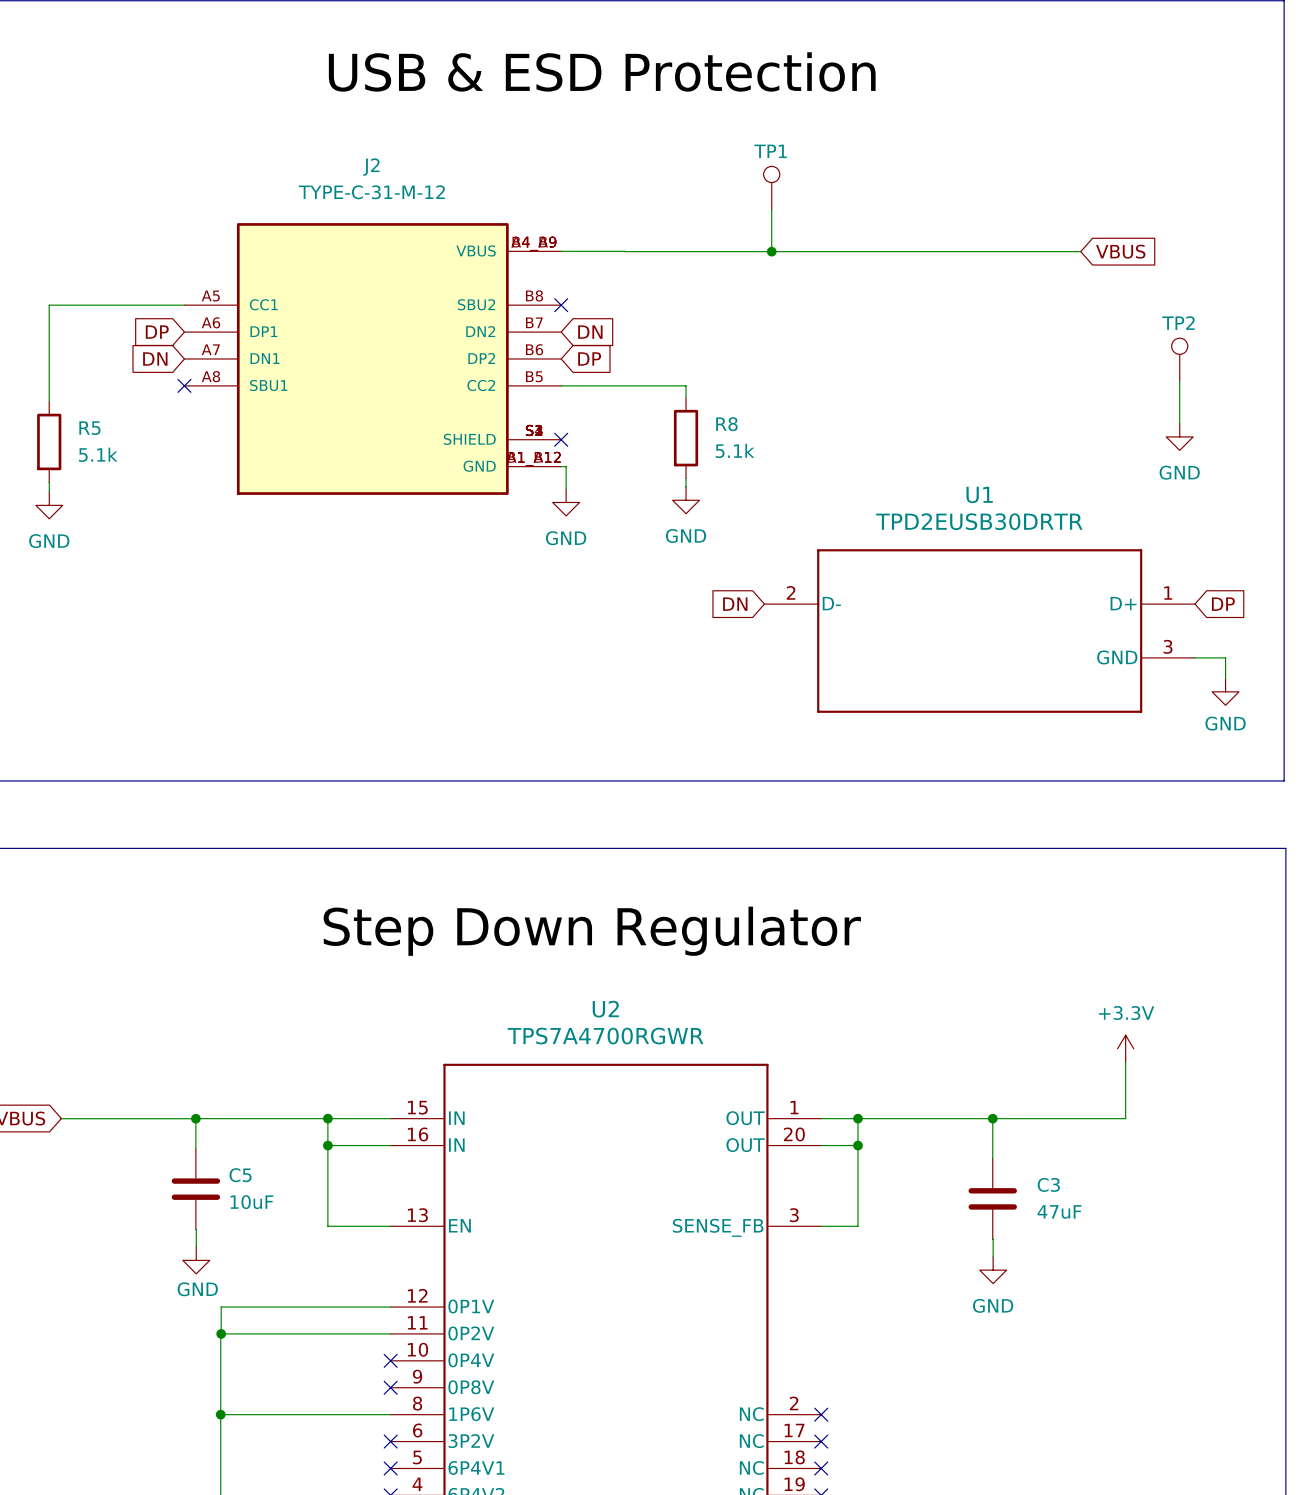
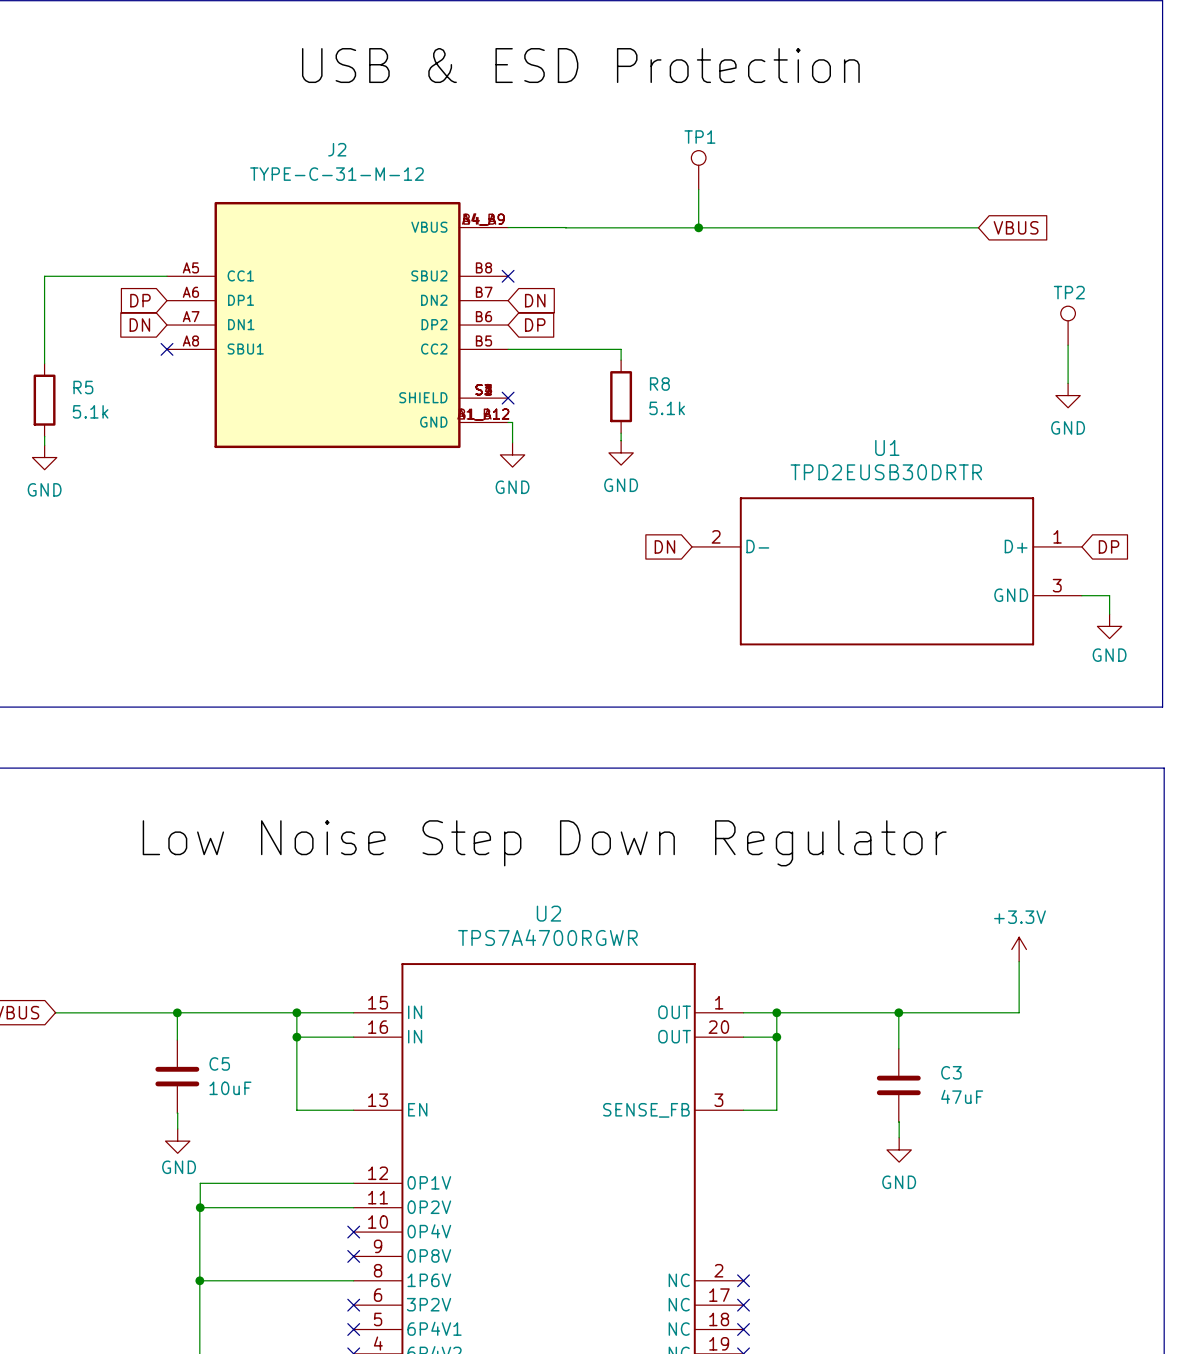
label: Step Down Regulator (592, 931) -> Low Noise Step Down Regulator (544, 843)

